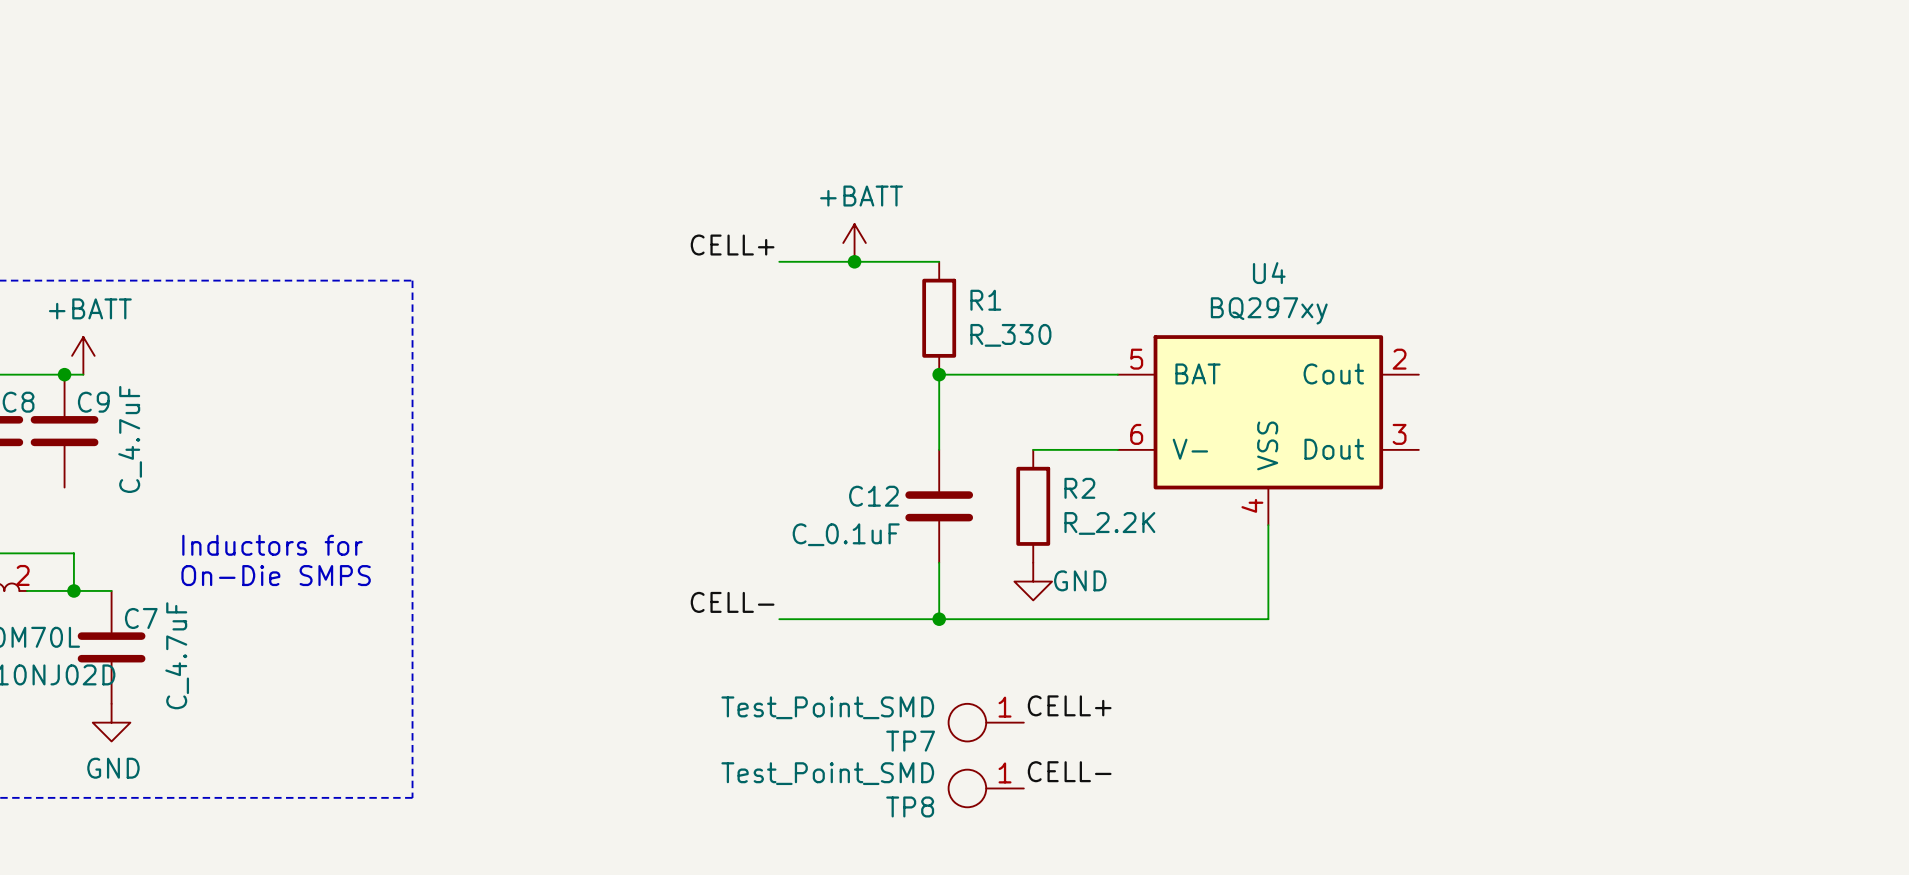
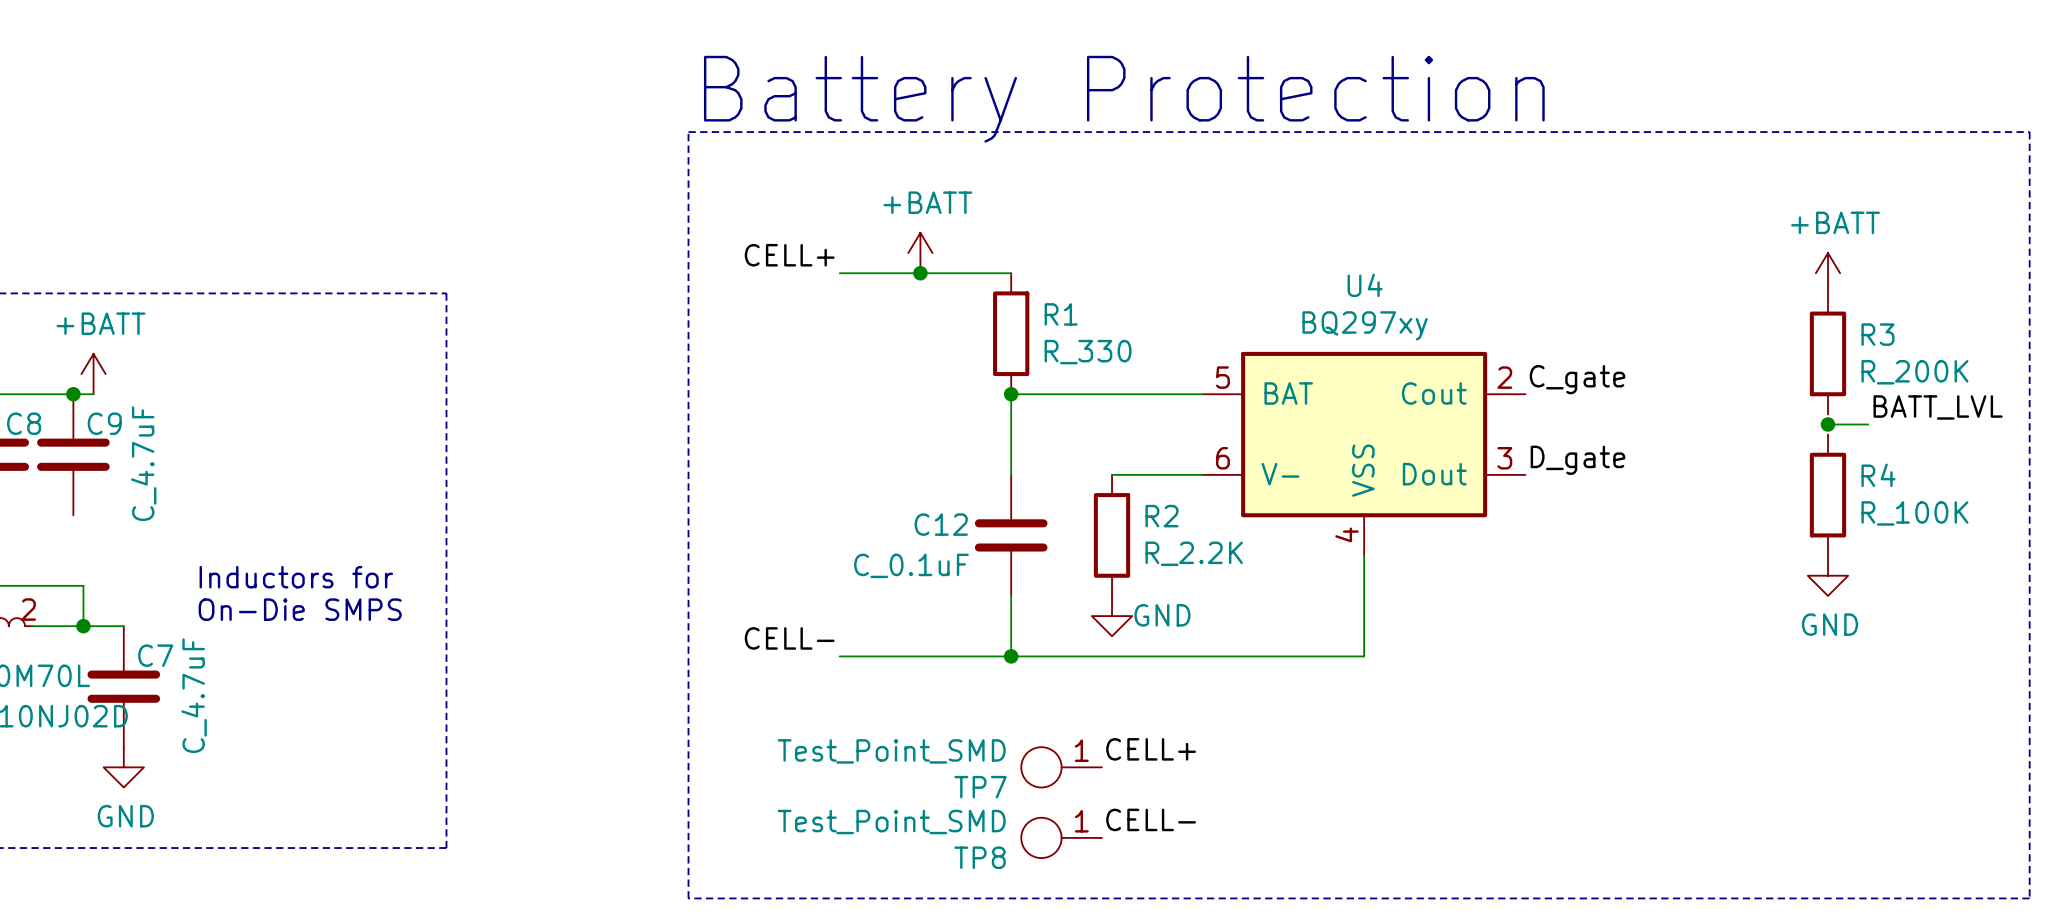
text: none -> Battery Protection (1124, 99)
line: none -> (688, 132) (2029, 132) (2029, 898) (688, 898) (688, 132)
power symbol: none -> +BATT (1827, 273)
R3: none -> R_200K (1827, 353)
label: none -> C_gate (1577, 379)
label: none -> BATT_LVL (1938, 407)
wire: none -> (1827, 424) (1868, 424)
junction: none -> (1827, 424)
label: none -> D_gate (1577, 460)
R4: none -> R_100K (1827, 495)
power symbol: none -> GND (1827, 575)

